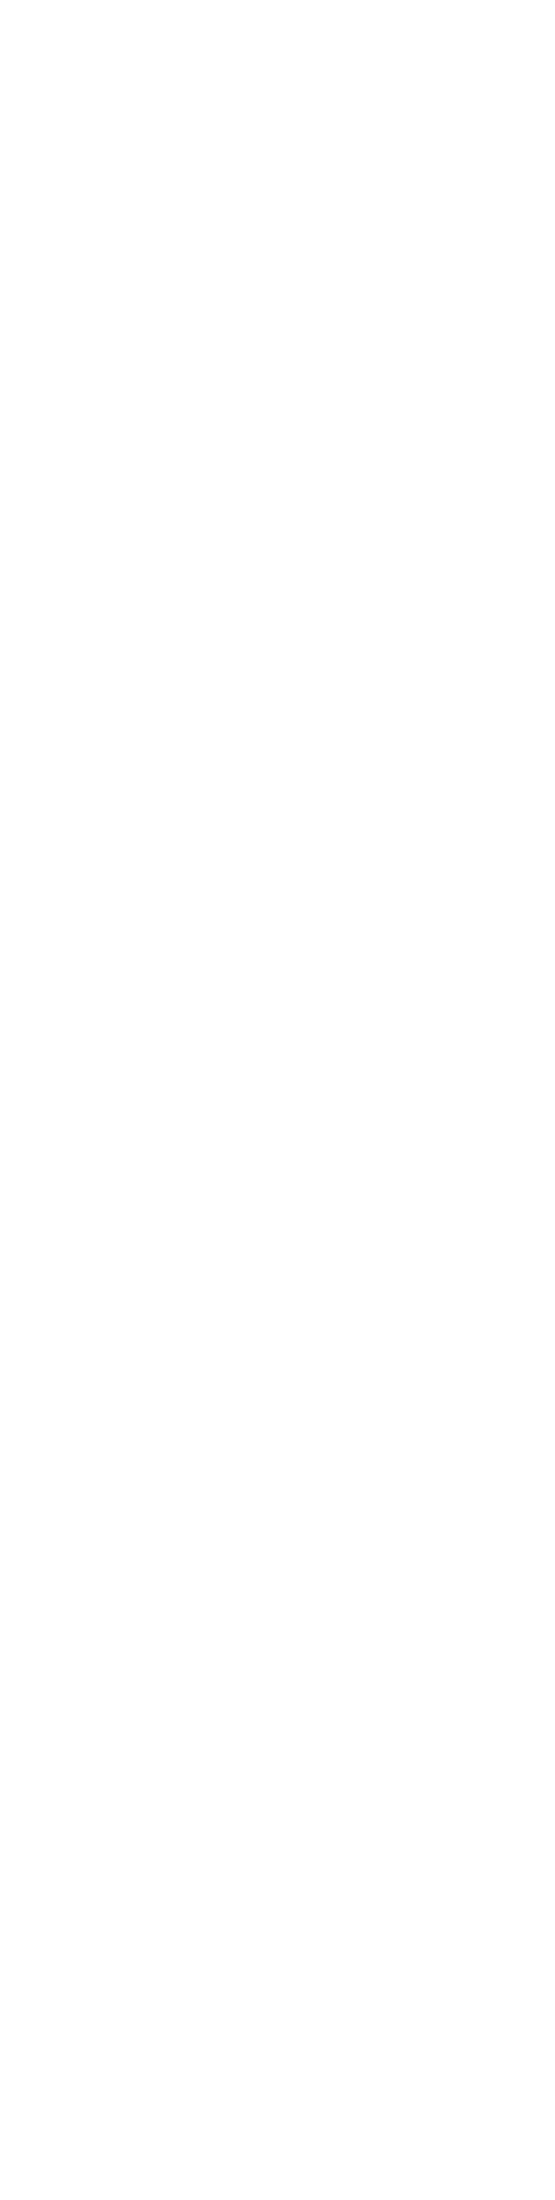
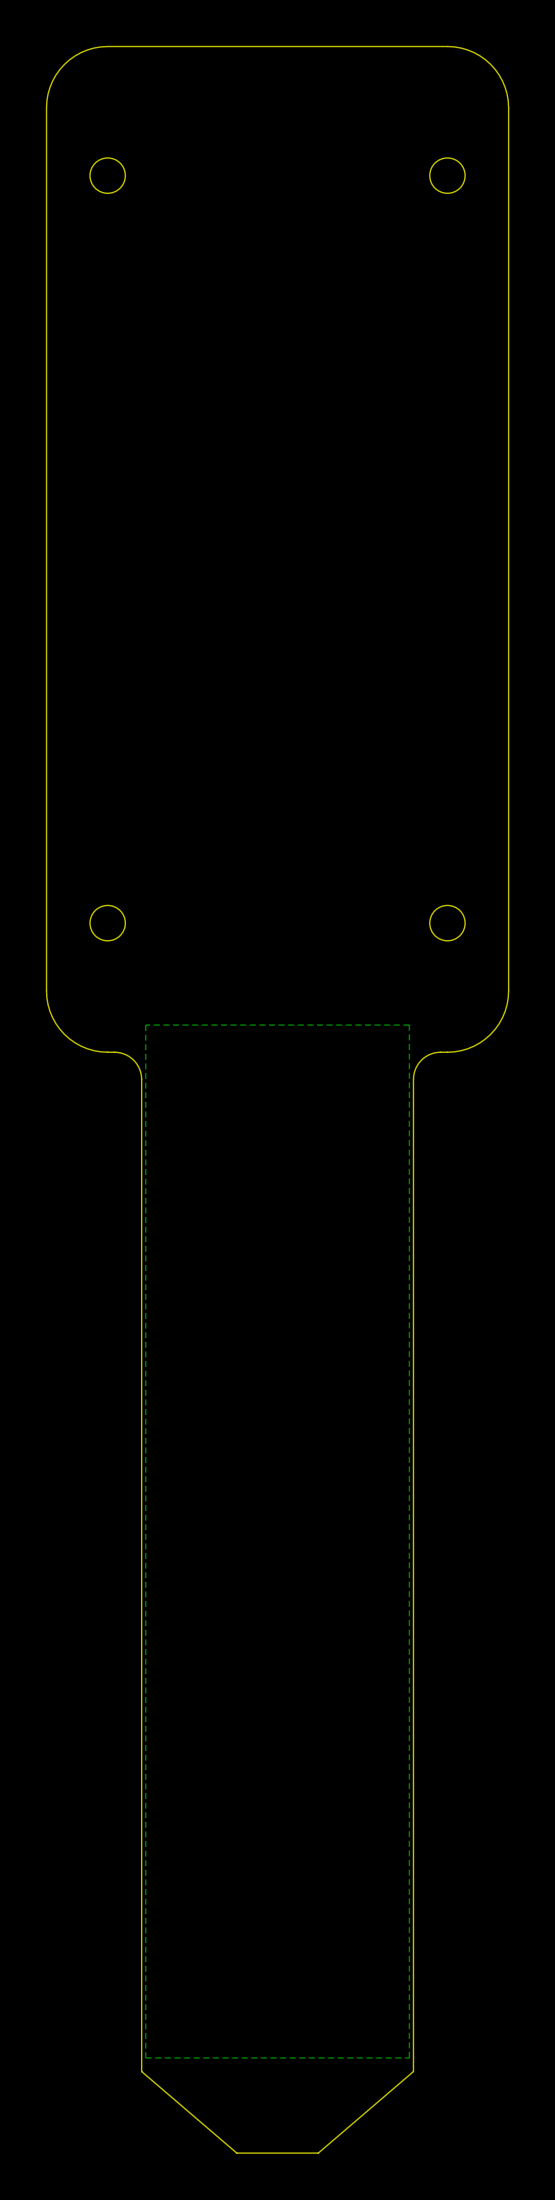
board edge: none -> (447, 46) (100, 46) (81, 52) (64, 64) (52, 81) (46, 100) (46, 997) (49, 1011) (55, 1023) (69, 1038) (87, 1048) (120, 1052) (128, 1056) (137, 1064) (141, 1079) (141, 2071) (236, 2153) (318, 2153) (413, 2071) (413, 1076) (419, 1062) (428, 1054) (467, 1048) (479, 1042) (490, 1034) (499, 1023) (505, 1011) (508, 991) (508, 100) (502, 81) (495, 69) (485, 59) (467, 49) (447, 46)
round board edge: none -> [89, 157, 127, 194]
round board edge: none -> [429, 157, 466, 194]
round board edge: none -> [89, 904, 127, 942]
round board edge: none -> [429, 904, 466, 942]
zone outline: none -> (409, 1025) (145, 1025) (145, 2057) (409, 2057) (409, 1025)

